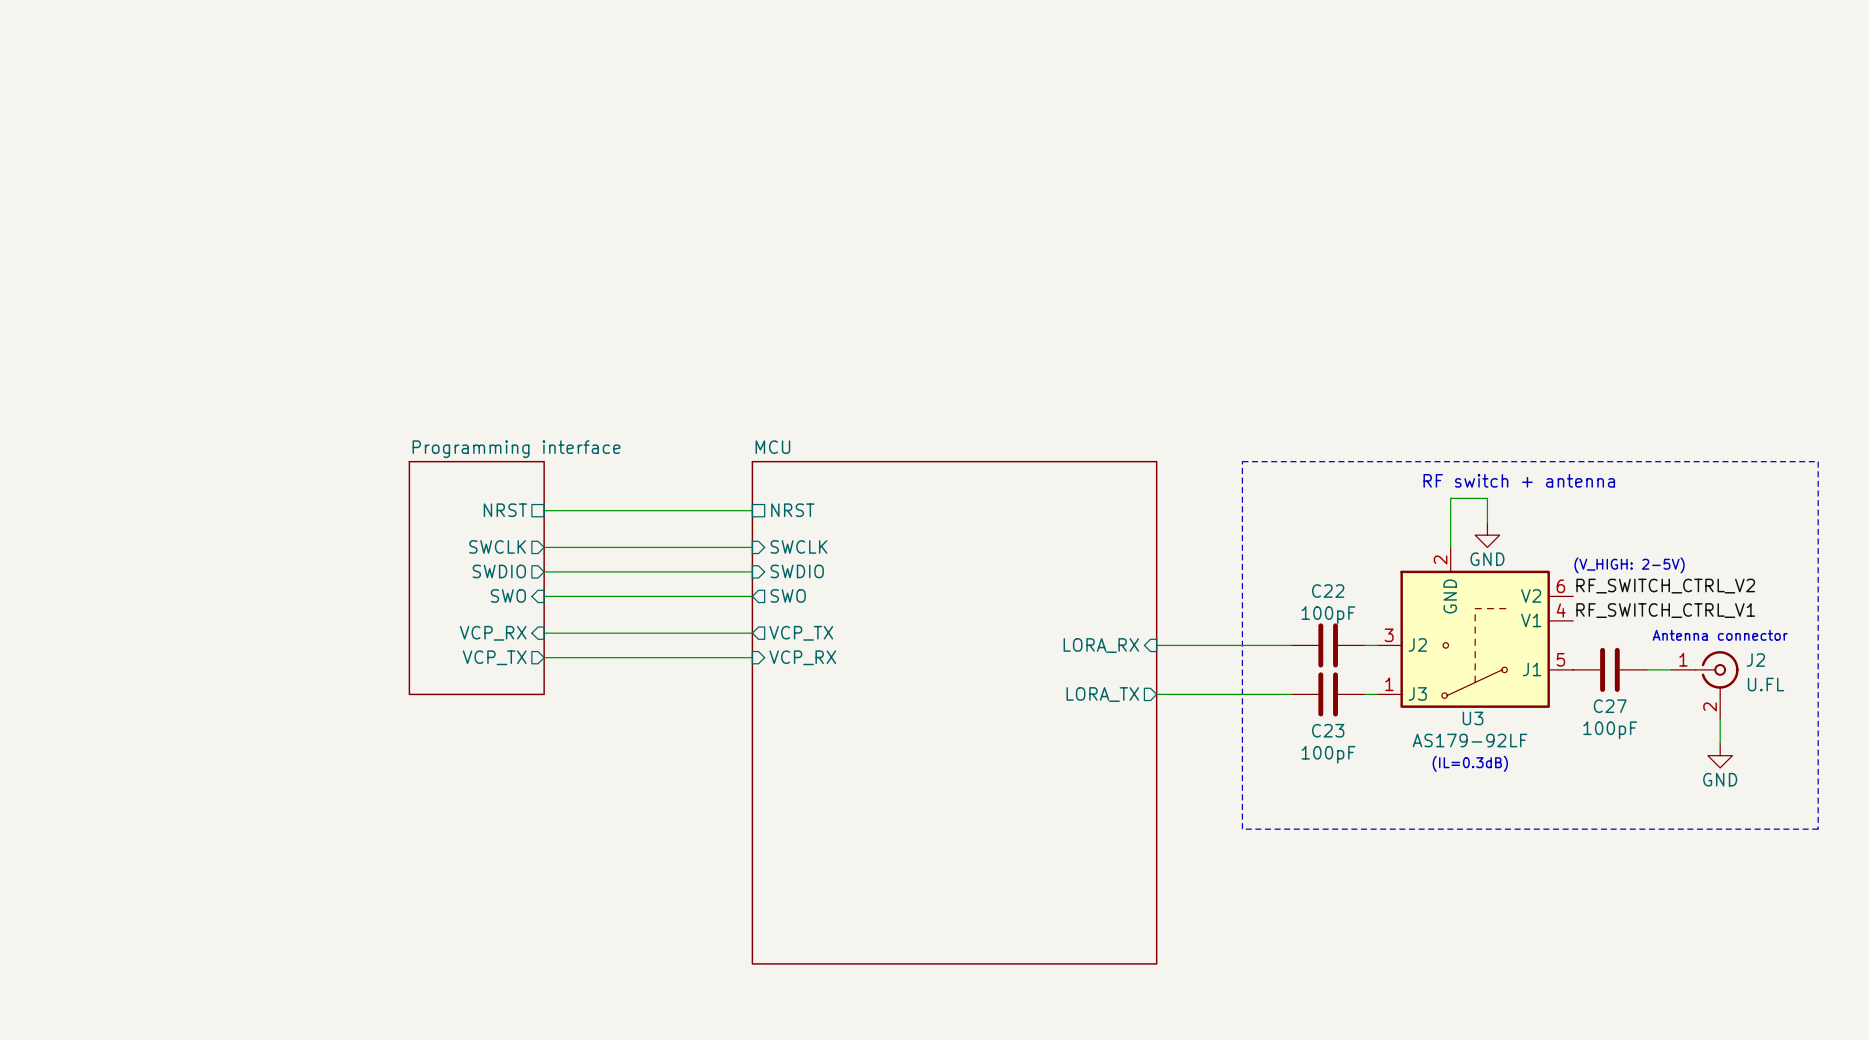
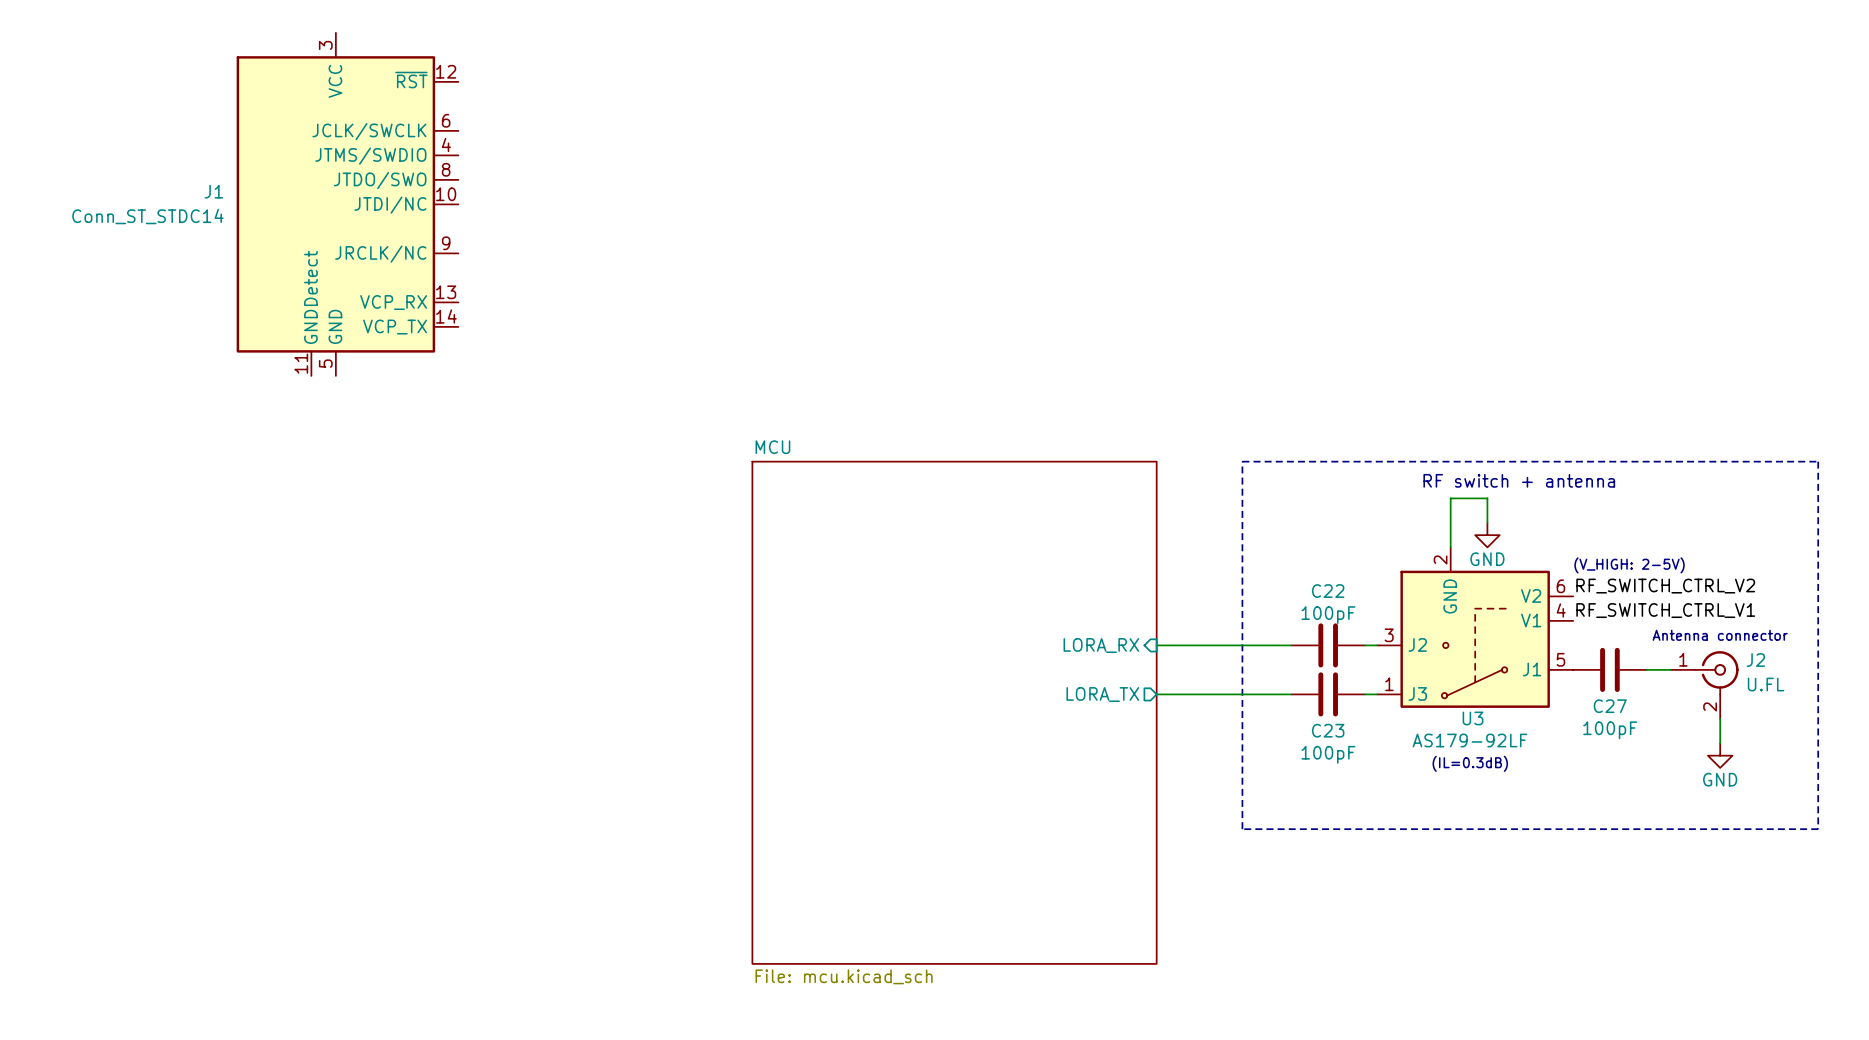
J1: none -> Conn_ST_STDC14 (347, 204)
sheet pin: NRST (505, 510) -> none
wire: (544, 510) (752, 510) -> none
sheet pin: NRST (792, 510) -> none
sheet pin: SWCLK (497, 546) -> none
sheet pin: SWCLK (798, 546) -> none
wire: (544, 547) (752, 547) -> none
sheet pin: SWDIO (499, 571) -> none
wire: (544, 571) (752, 571) -> none
sheet pin: SWDIO (797, 571) -> none
sheet Programming interface: (476, 578) -> none
sheet pin: SWO (508, 595) -> none
sheet pin: SWO (788, 595) -> none
wire: (544, 596) (752, 596) -> none
sheet pin: VCP_RX (493, 633) -> none
wire: (544, 633) (752, 633) -> none
sheet pin: VCP_TX (801, 633) -> none
sheet pin: VCP_TX (494, 657) -> none
wire: (544, 657) (752, 657) -> none
sheet pin: VCP_RX (802, 657) -> none
sheet MCU value: none -> File: mcu.kicad_sch (844, 976)

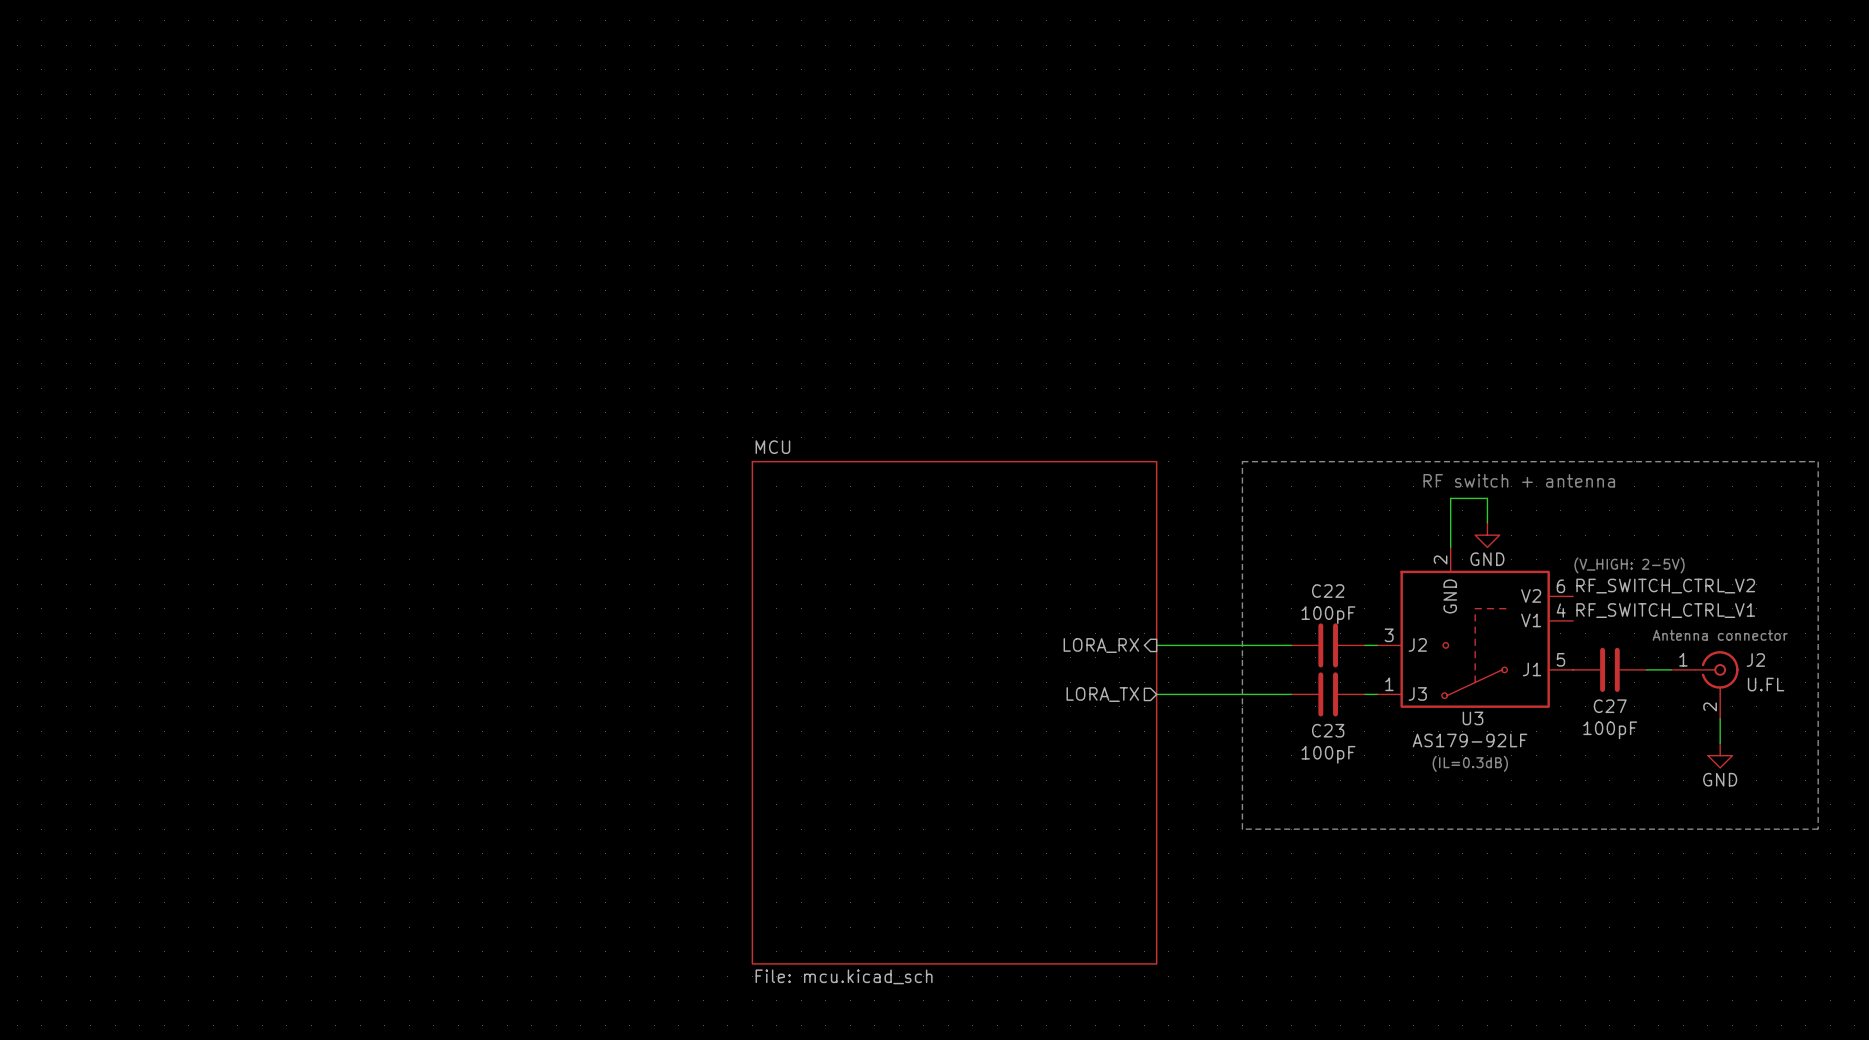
J1: Conn_ST_STDC14 (347, 204) -> none

